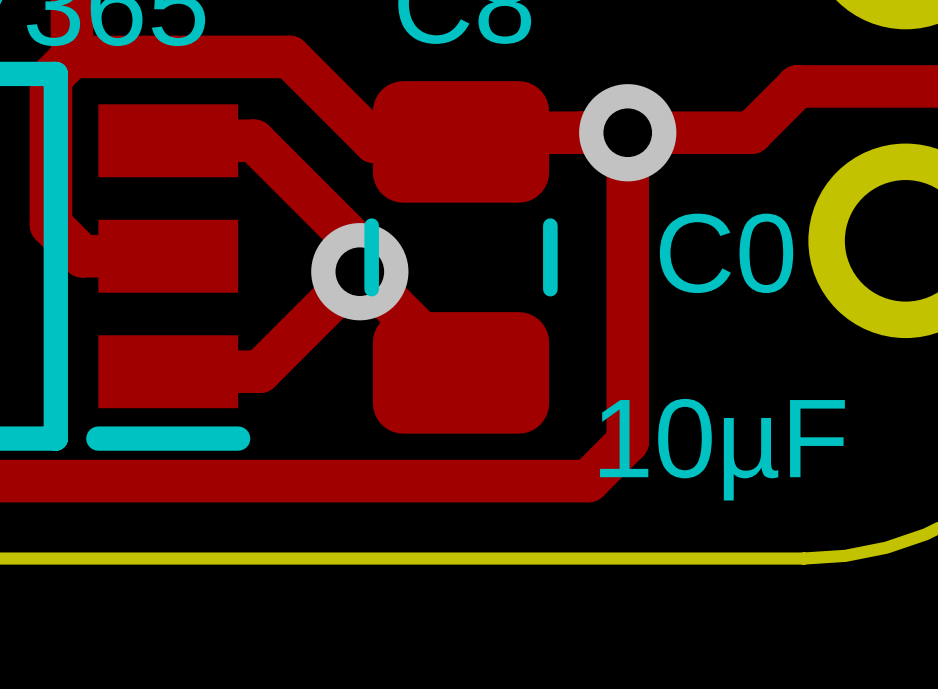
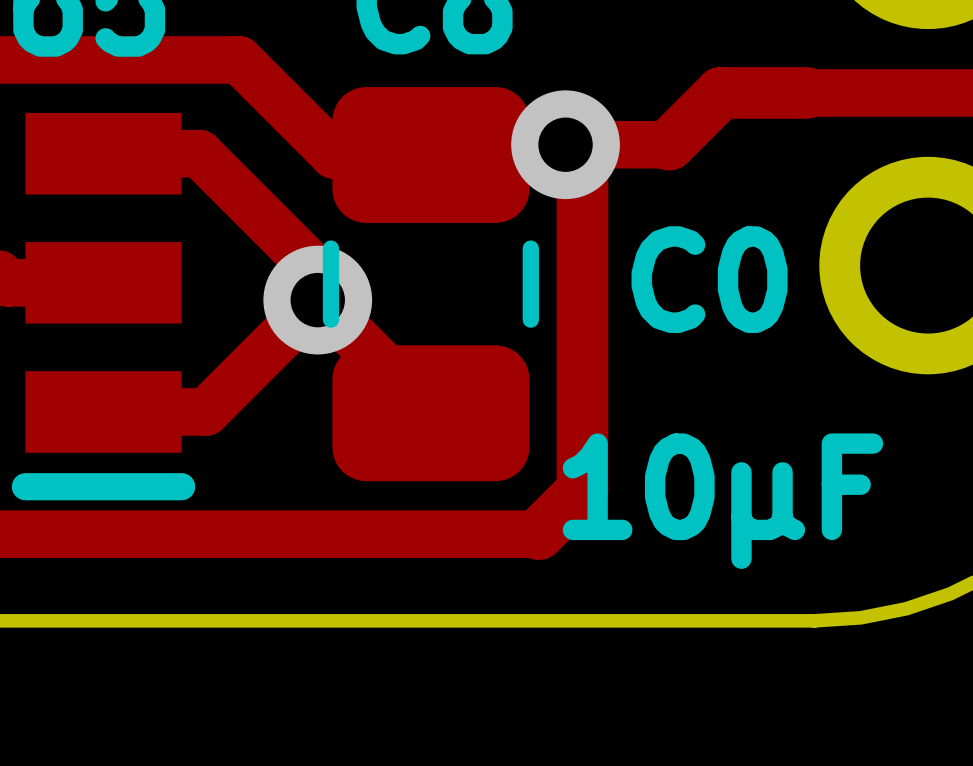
track: (797, 86) (751, 132) (674, 132) -> (807, 92) (720, 92) (669, 144)
track: (627, 132) (627, 441) (588, 481) (557, 481) -> (565, 144) (582, 161) (582, 490) (538, 534)
via position: (627, 132) -> (565, 144)

